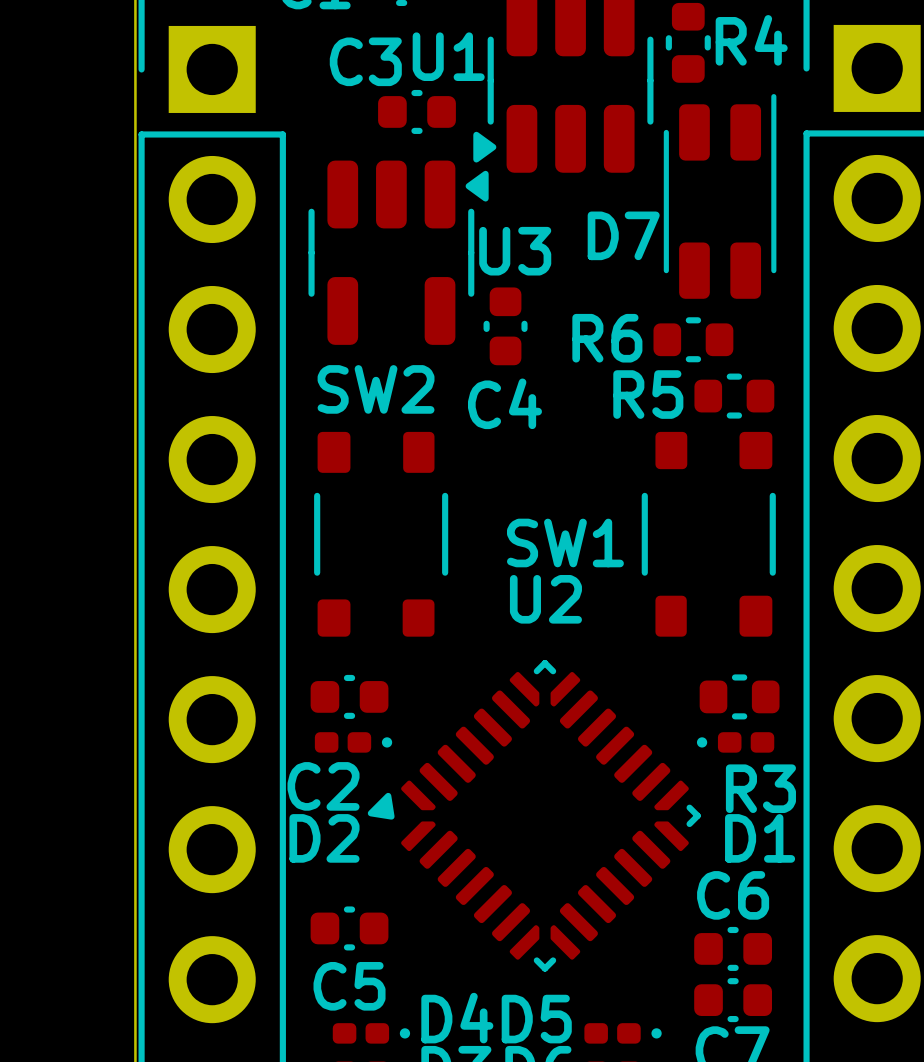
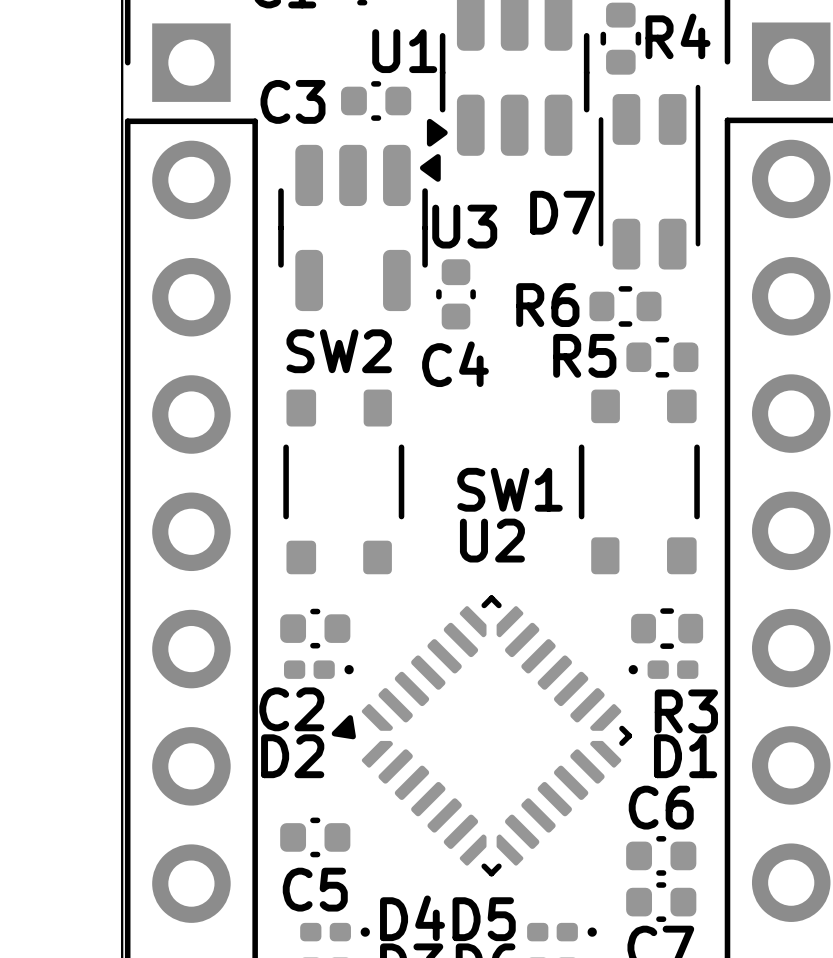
C3 name position: C3 (365, 61) -> C3 (293, 101)

